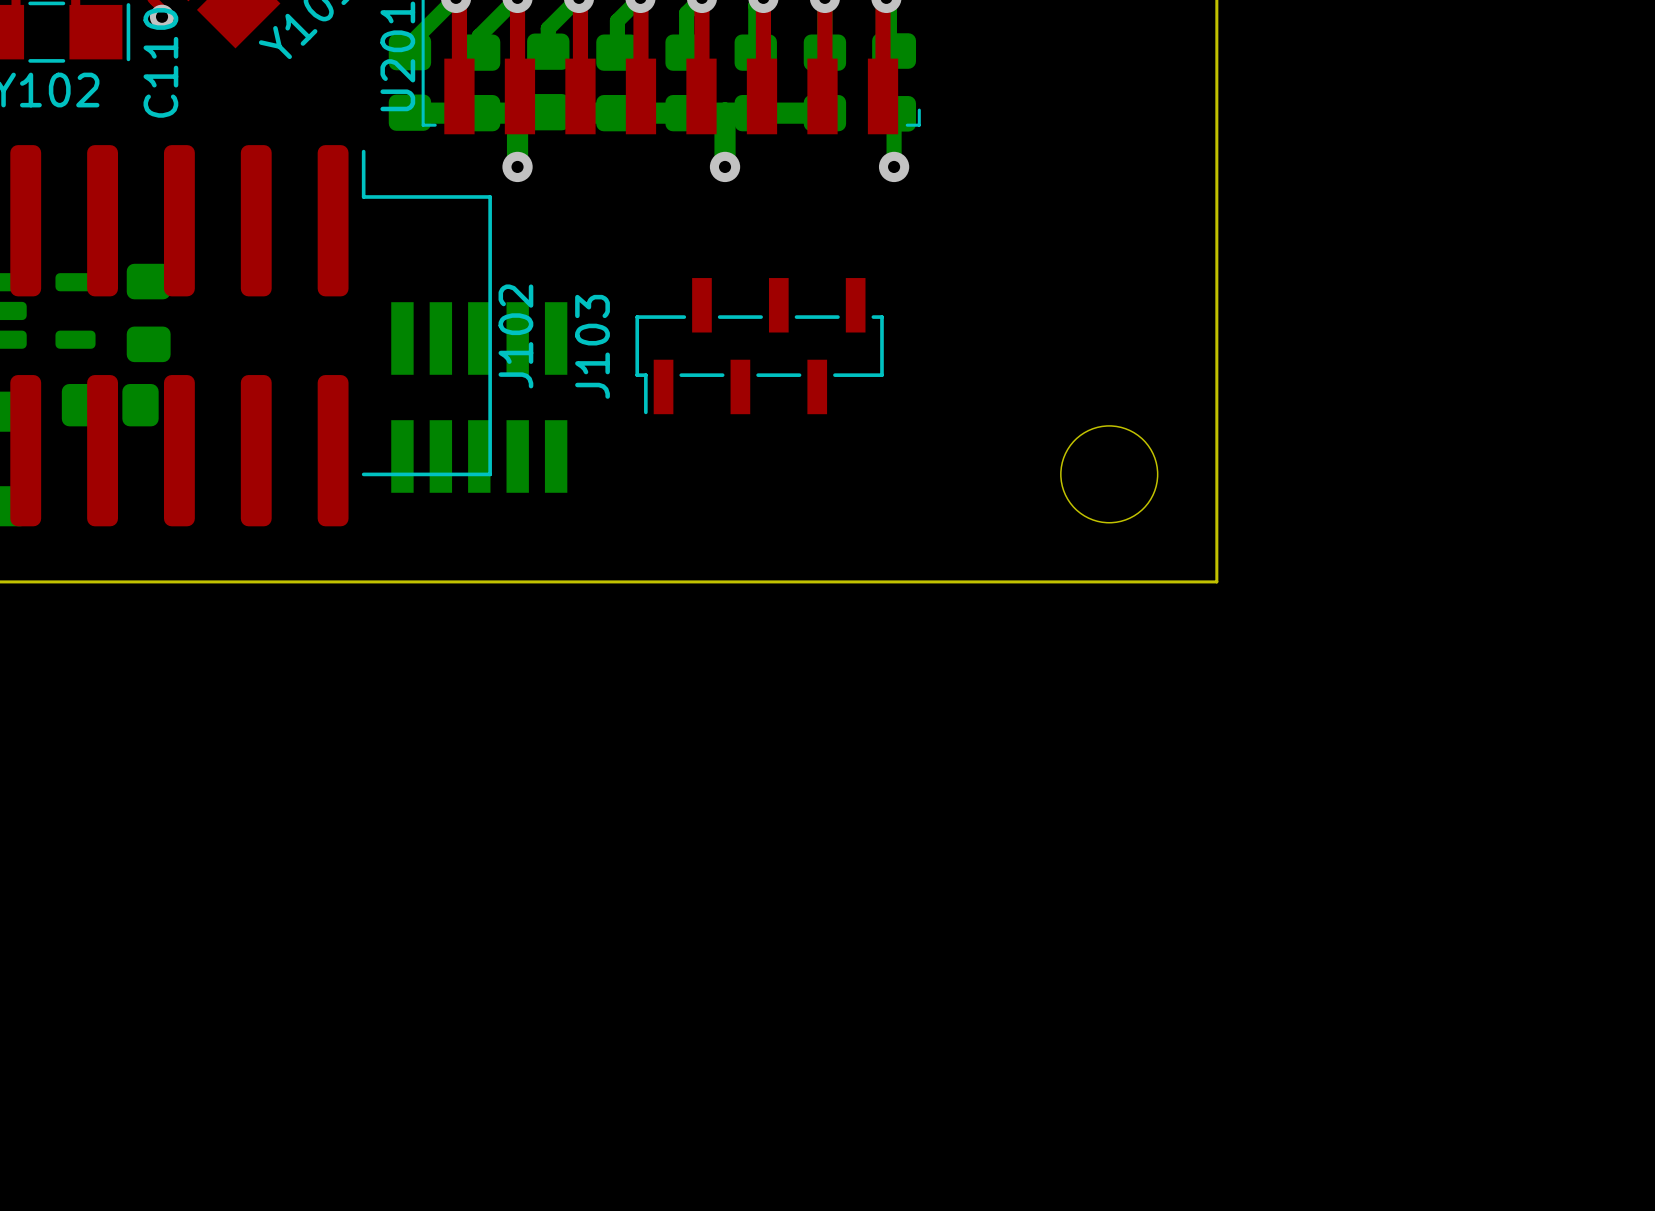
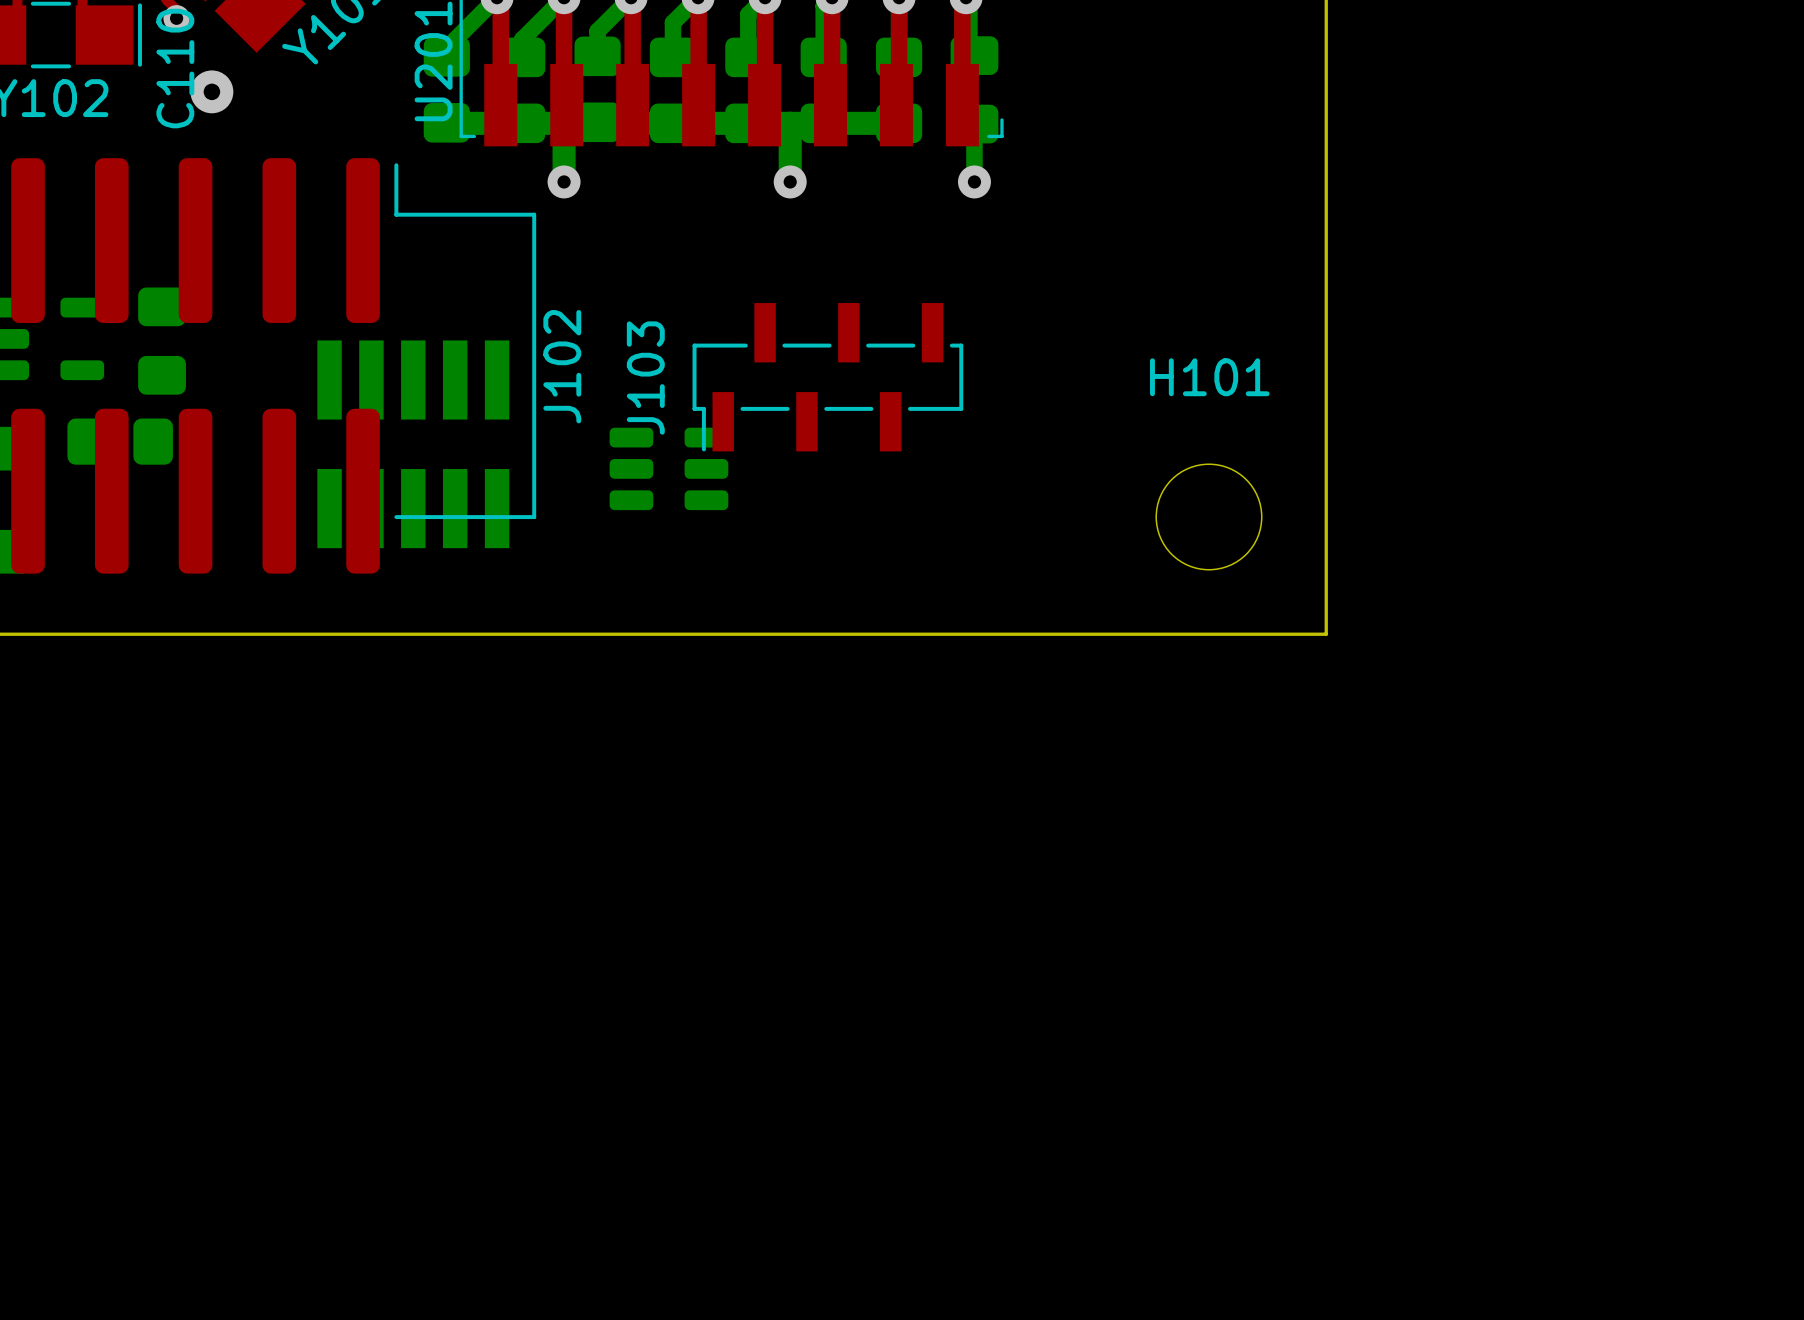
via: none -> (211, 91)
H101 name: none -> H101 (1209, 377)
part position: (479, 397) -> (413, 444)
part: none -> (668, 468)

